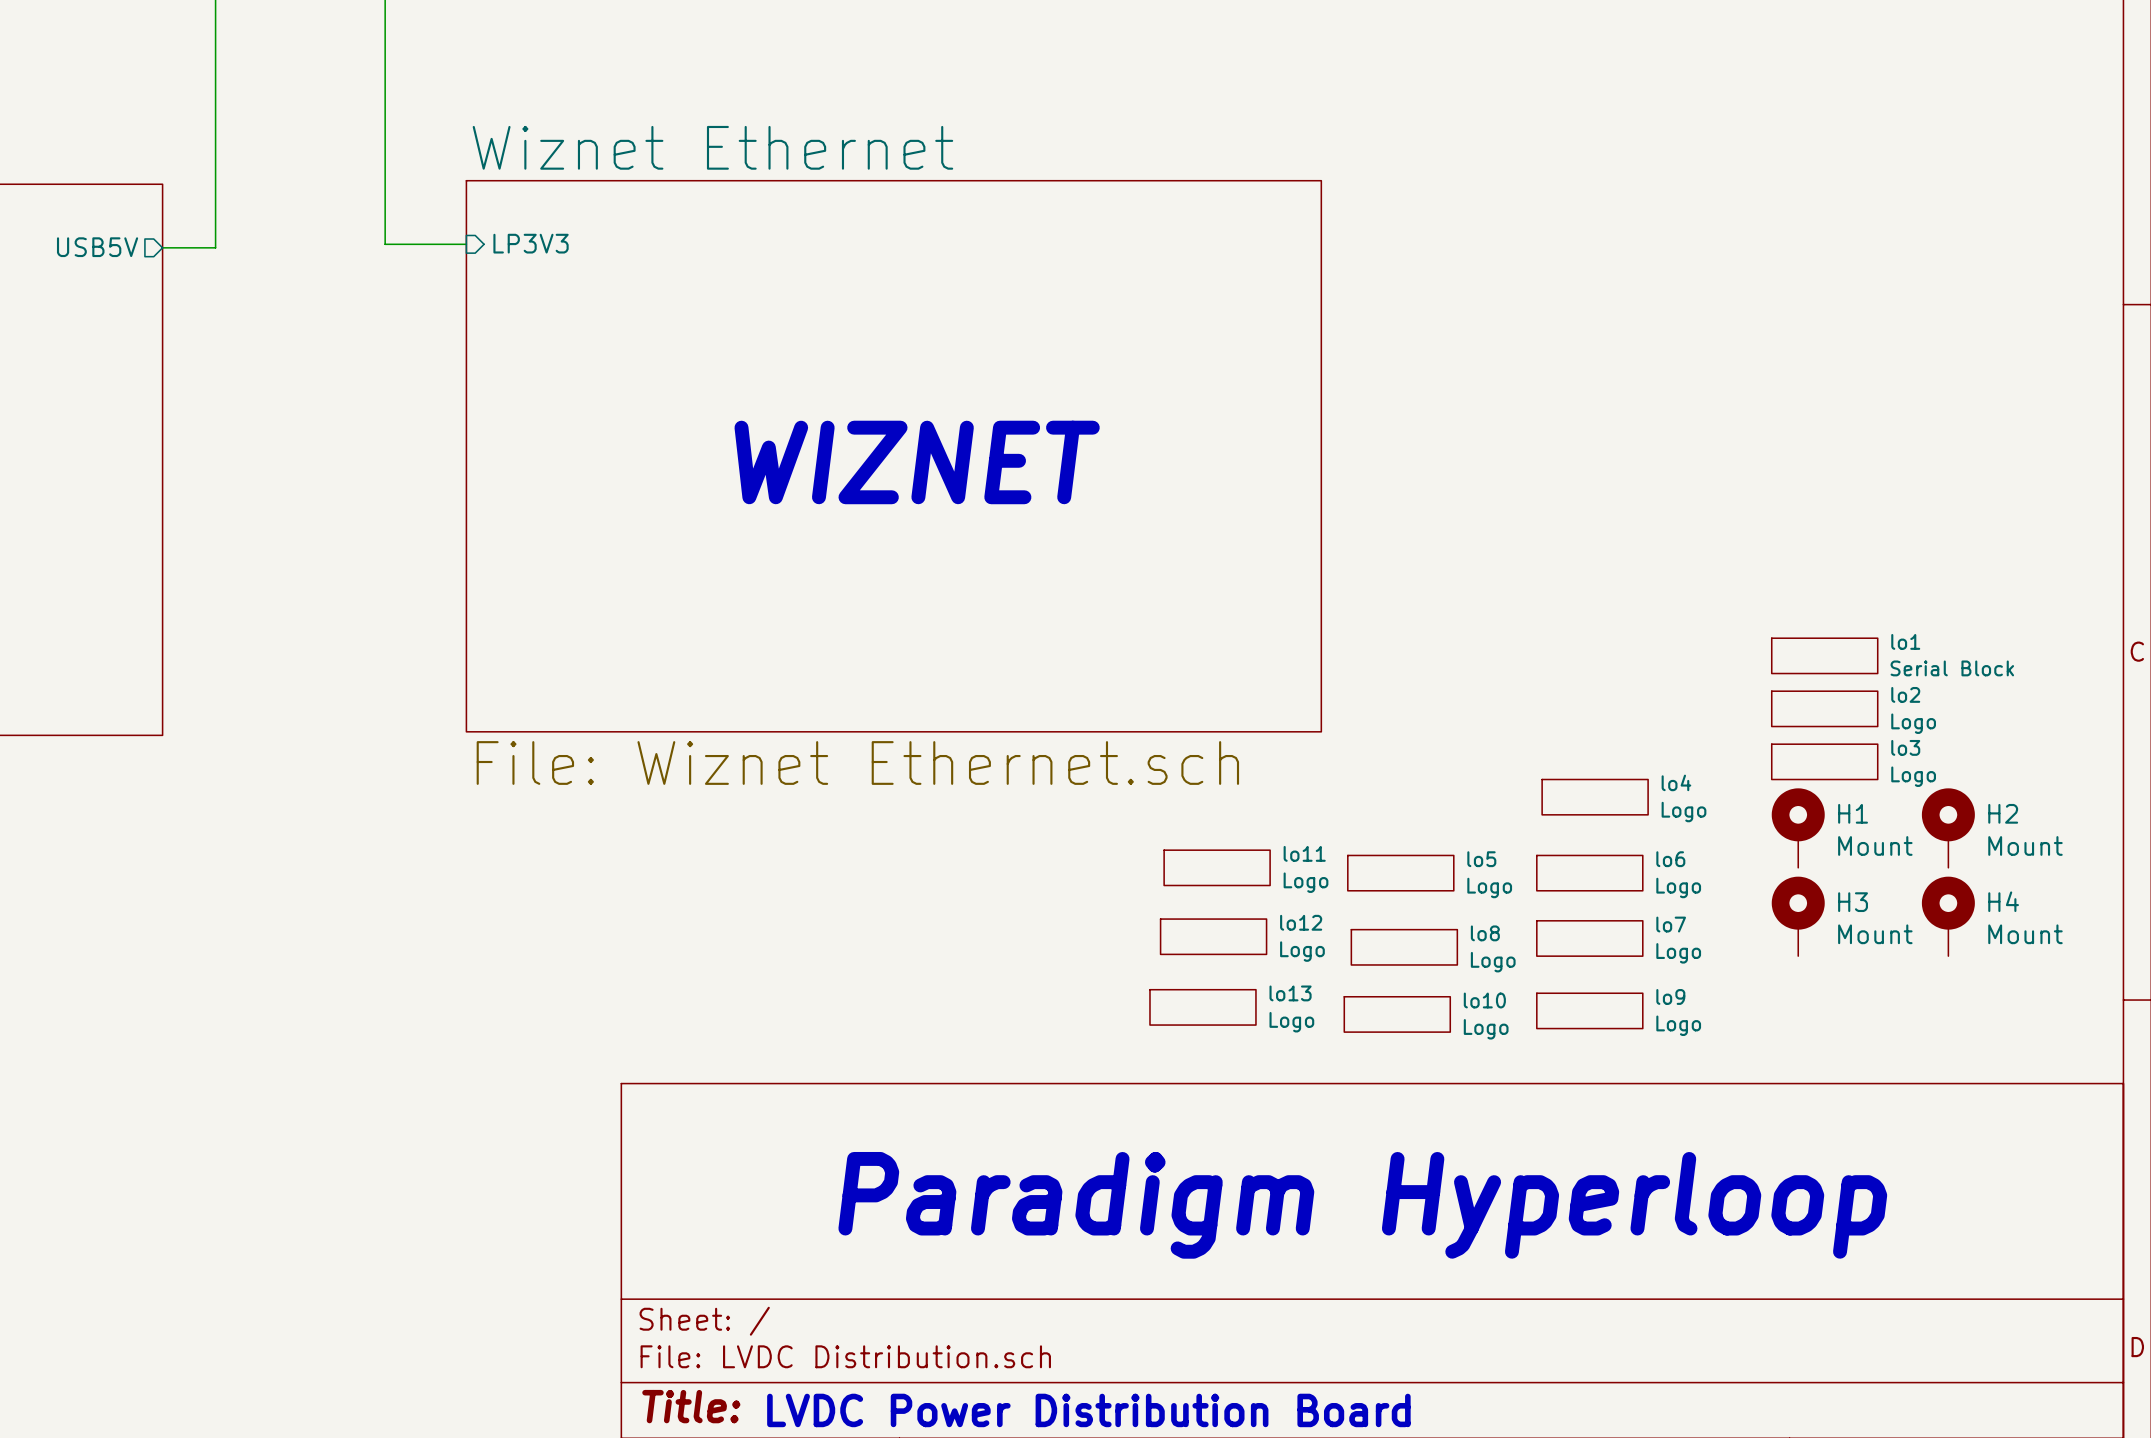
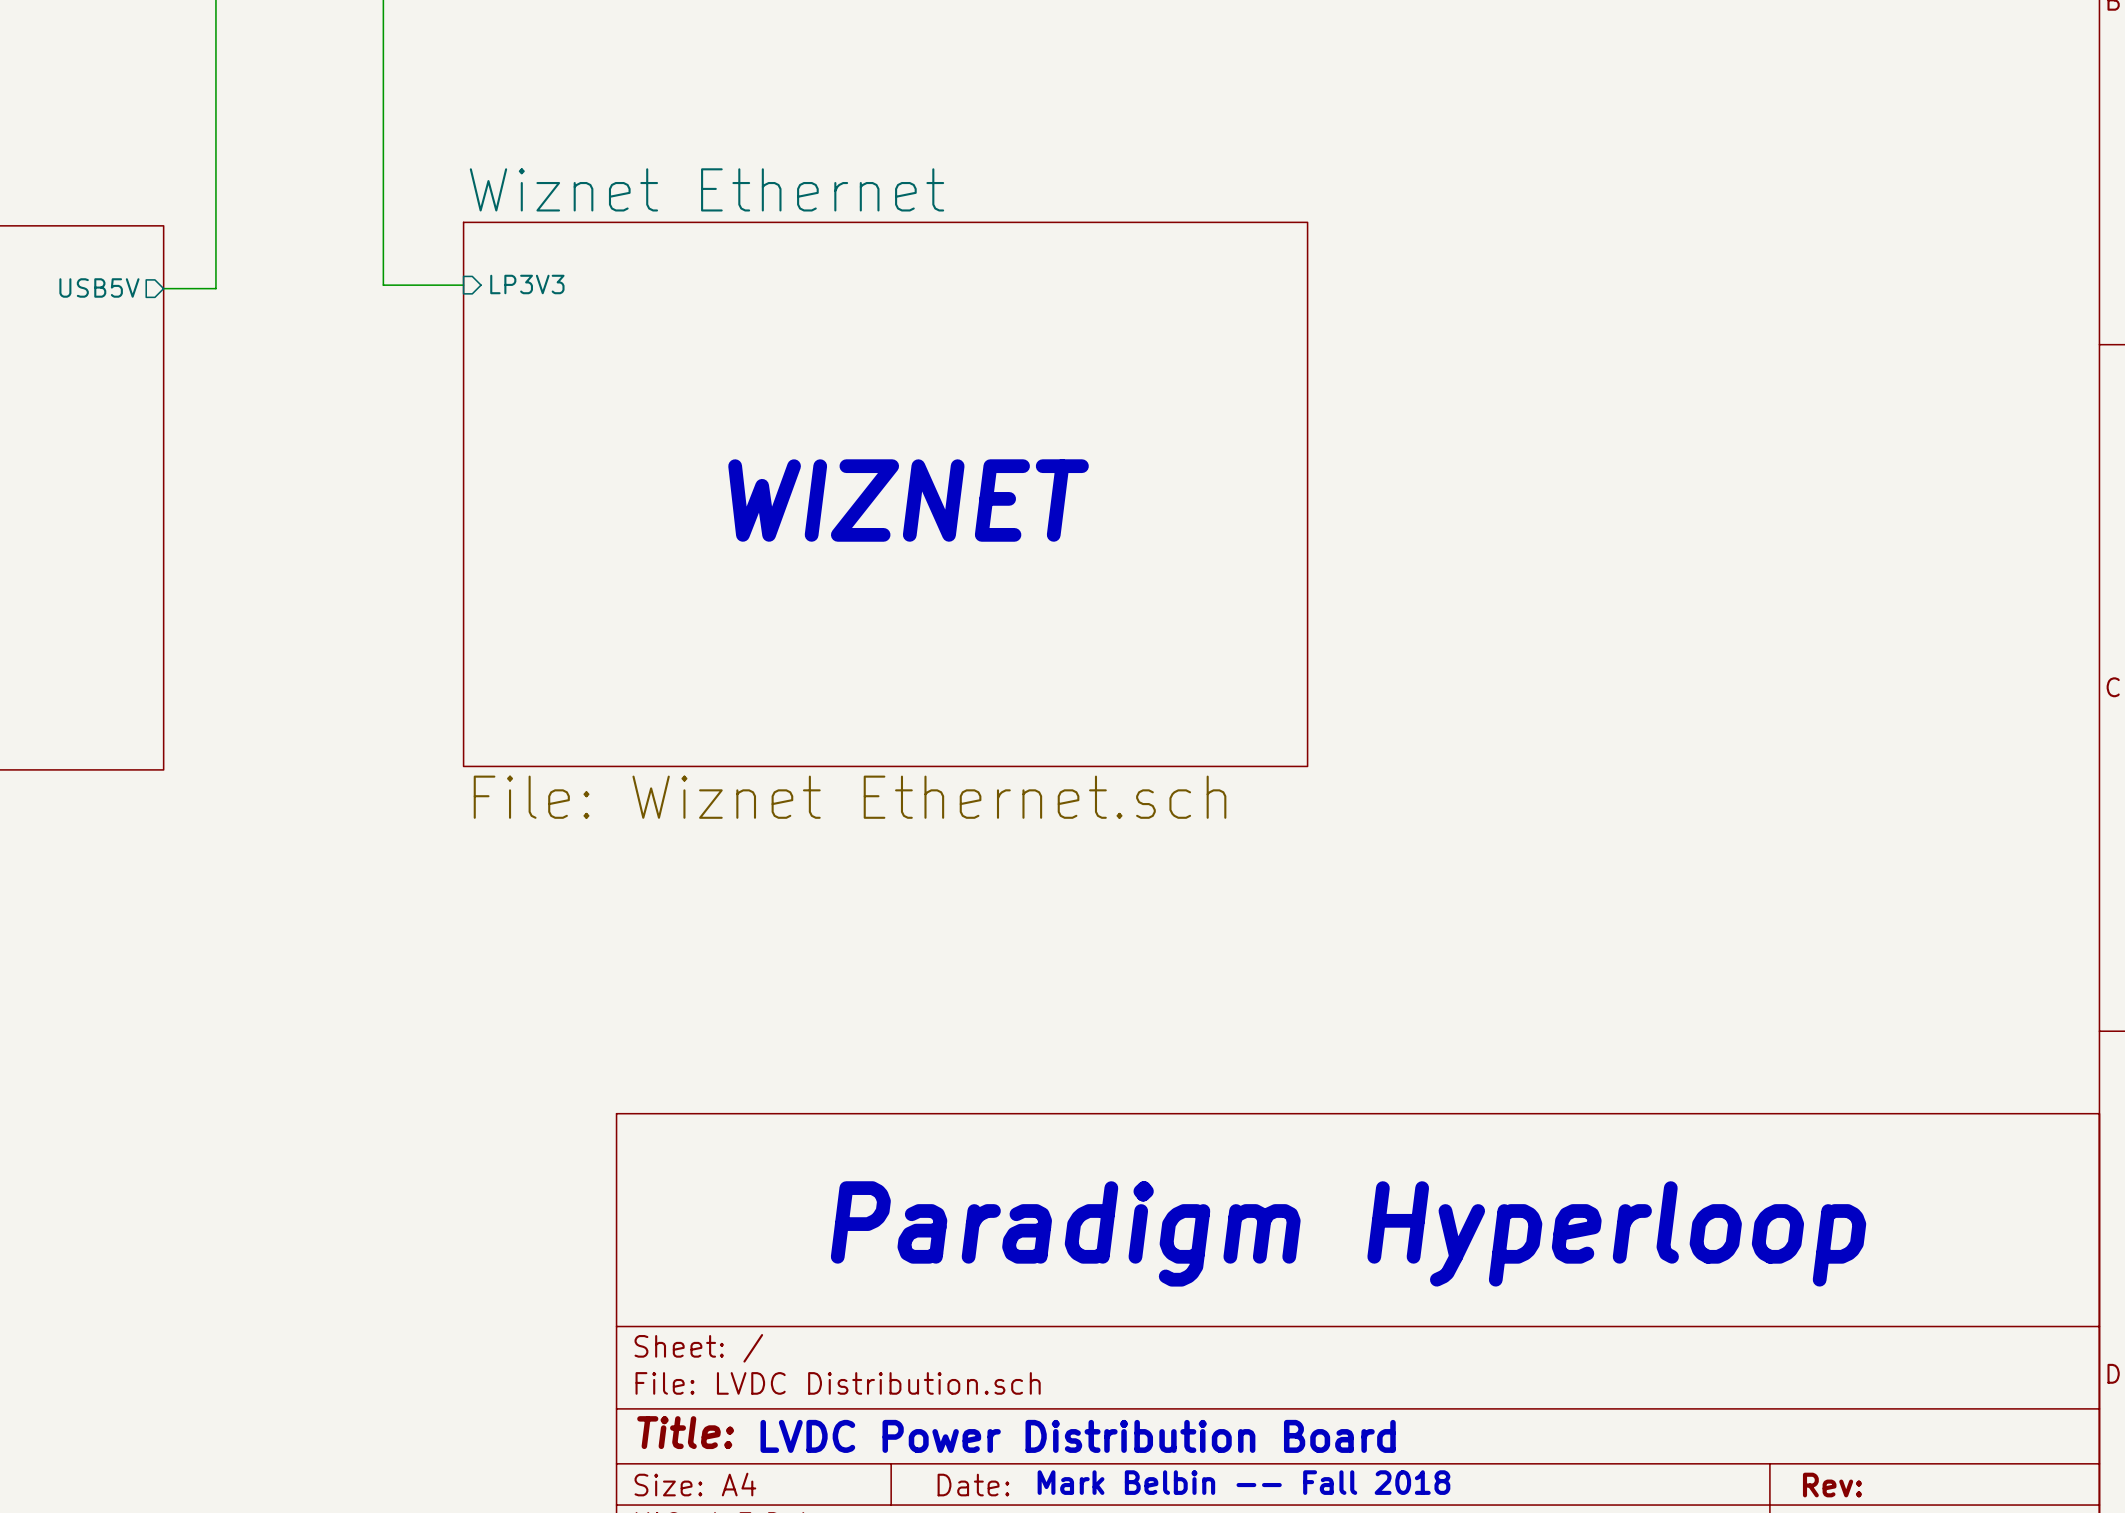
lo1: Serial Block (1824, 655) -> none
lo2: Logo (1824, 708) -> none
lo3: Logo (1824, 761) -> none
lo4: Logo (1595, 797) -> none
H1: Mount (1798, 828) -> none
H2: Mount (1948, 828) -> none
lo11: Logo (1217, 867) -> none
lo5: Logo (1400, 873) -> none
lo6: Logo (1589, 873) -> none
H3: Mount (1798, 916) -> none
H4: Mount (1948, 916) -> none
lo12: Logo (1213, 936) -> none
lo7: Logo (1589, 938) -> none
lo8: Logo (1404, 947) -> none
lo13: Logo (1202, 1007) -> none
lo9: Logo (1589, 1010) -> none
lo10: Logo (1397, 1014) -> none

